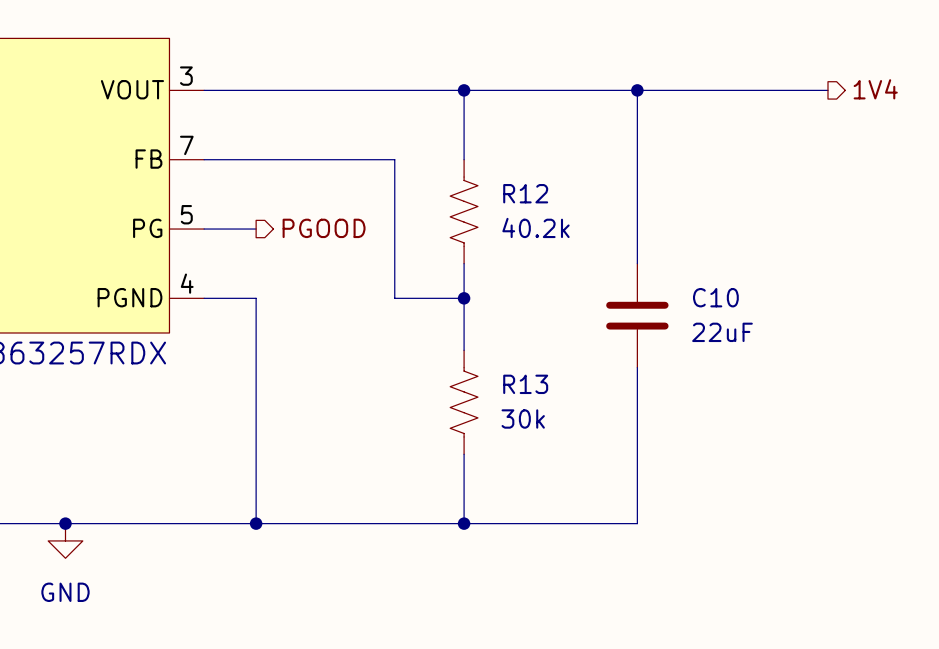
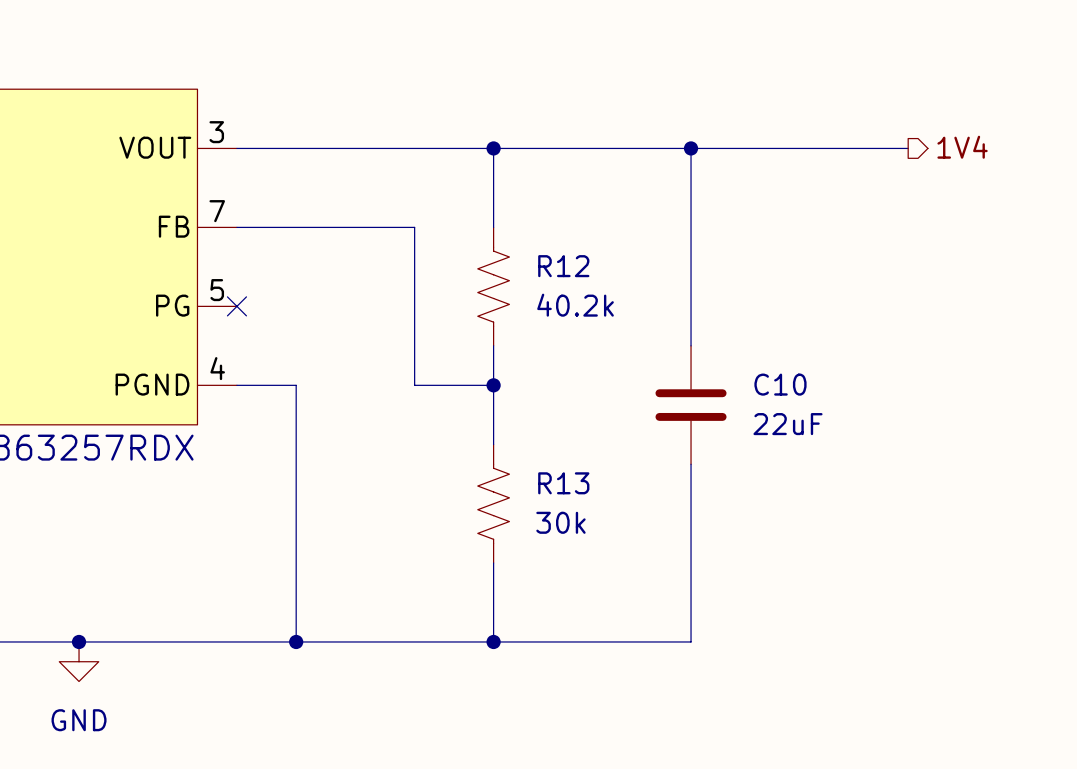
hierarchical label position: 1V4 (875, 89) -> 1V4 (962, 147)
wire: (464, 90) (464, 159) -> (493, 148) (493, 227)
junction position: (464, 90) -> (493, 148)
wire: (637, 90) (637, 263) -> (691, 148) (691, 345)
junction position: (637, 90) -> (691, 148)
wire: (793, 90) (827, 90) -> none
wire: (360, 159) (394, 159) (394, 298) -> (414, 227) (414, 385) (454, 385)
R12 position: (464, 211) -> (493, 286)
hierarchical label: PGOOD (324, 228) -> none
wire: (204, 229) (256, 229) -> none
no-connect mark: none -> (236, 306)
wire: (464, 263) (464, 350) -> (493, 345) (493, 444)
wire: (429, 298) (464, 298) -> none
junction position: (464, 298) -> (493, 385)
C10 position: (637, 315) -> (691, 405)
wire: (637, 367) (637, 523) (602, 523) -> (691, 464) (691, 641)
R13 position: (464, 402) -> (493, 503)
wire: (464, 454) (464, 523) -> (493, 563) (493, 641)
junction position: (464, 523) -> (493, 641)

